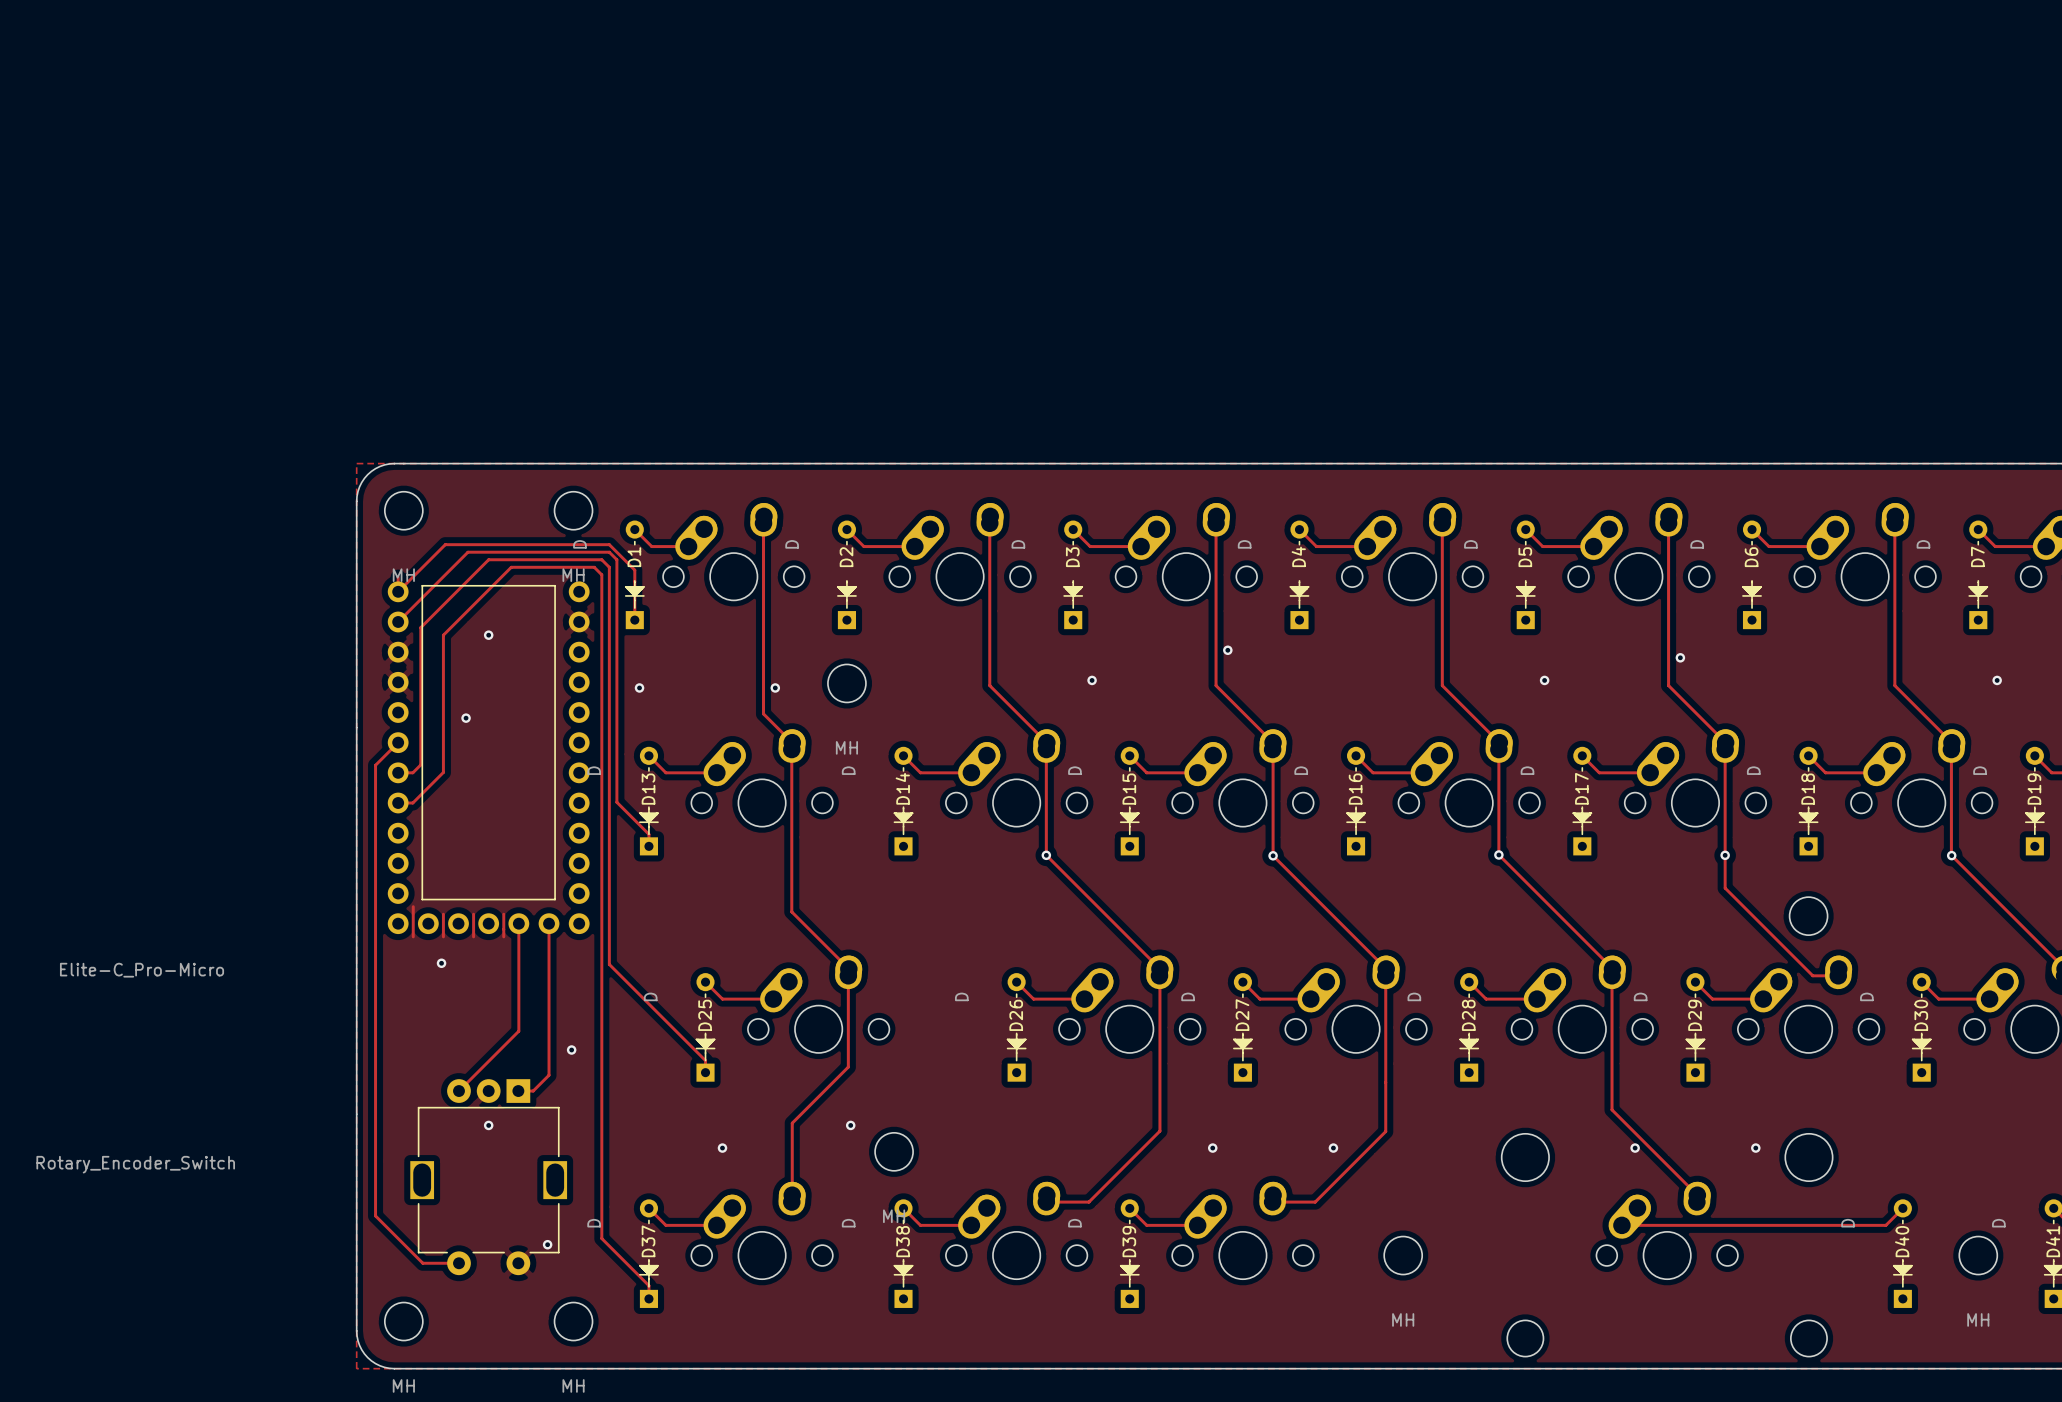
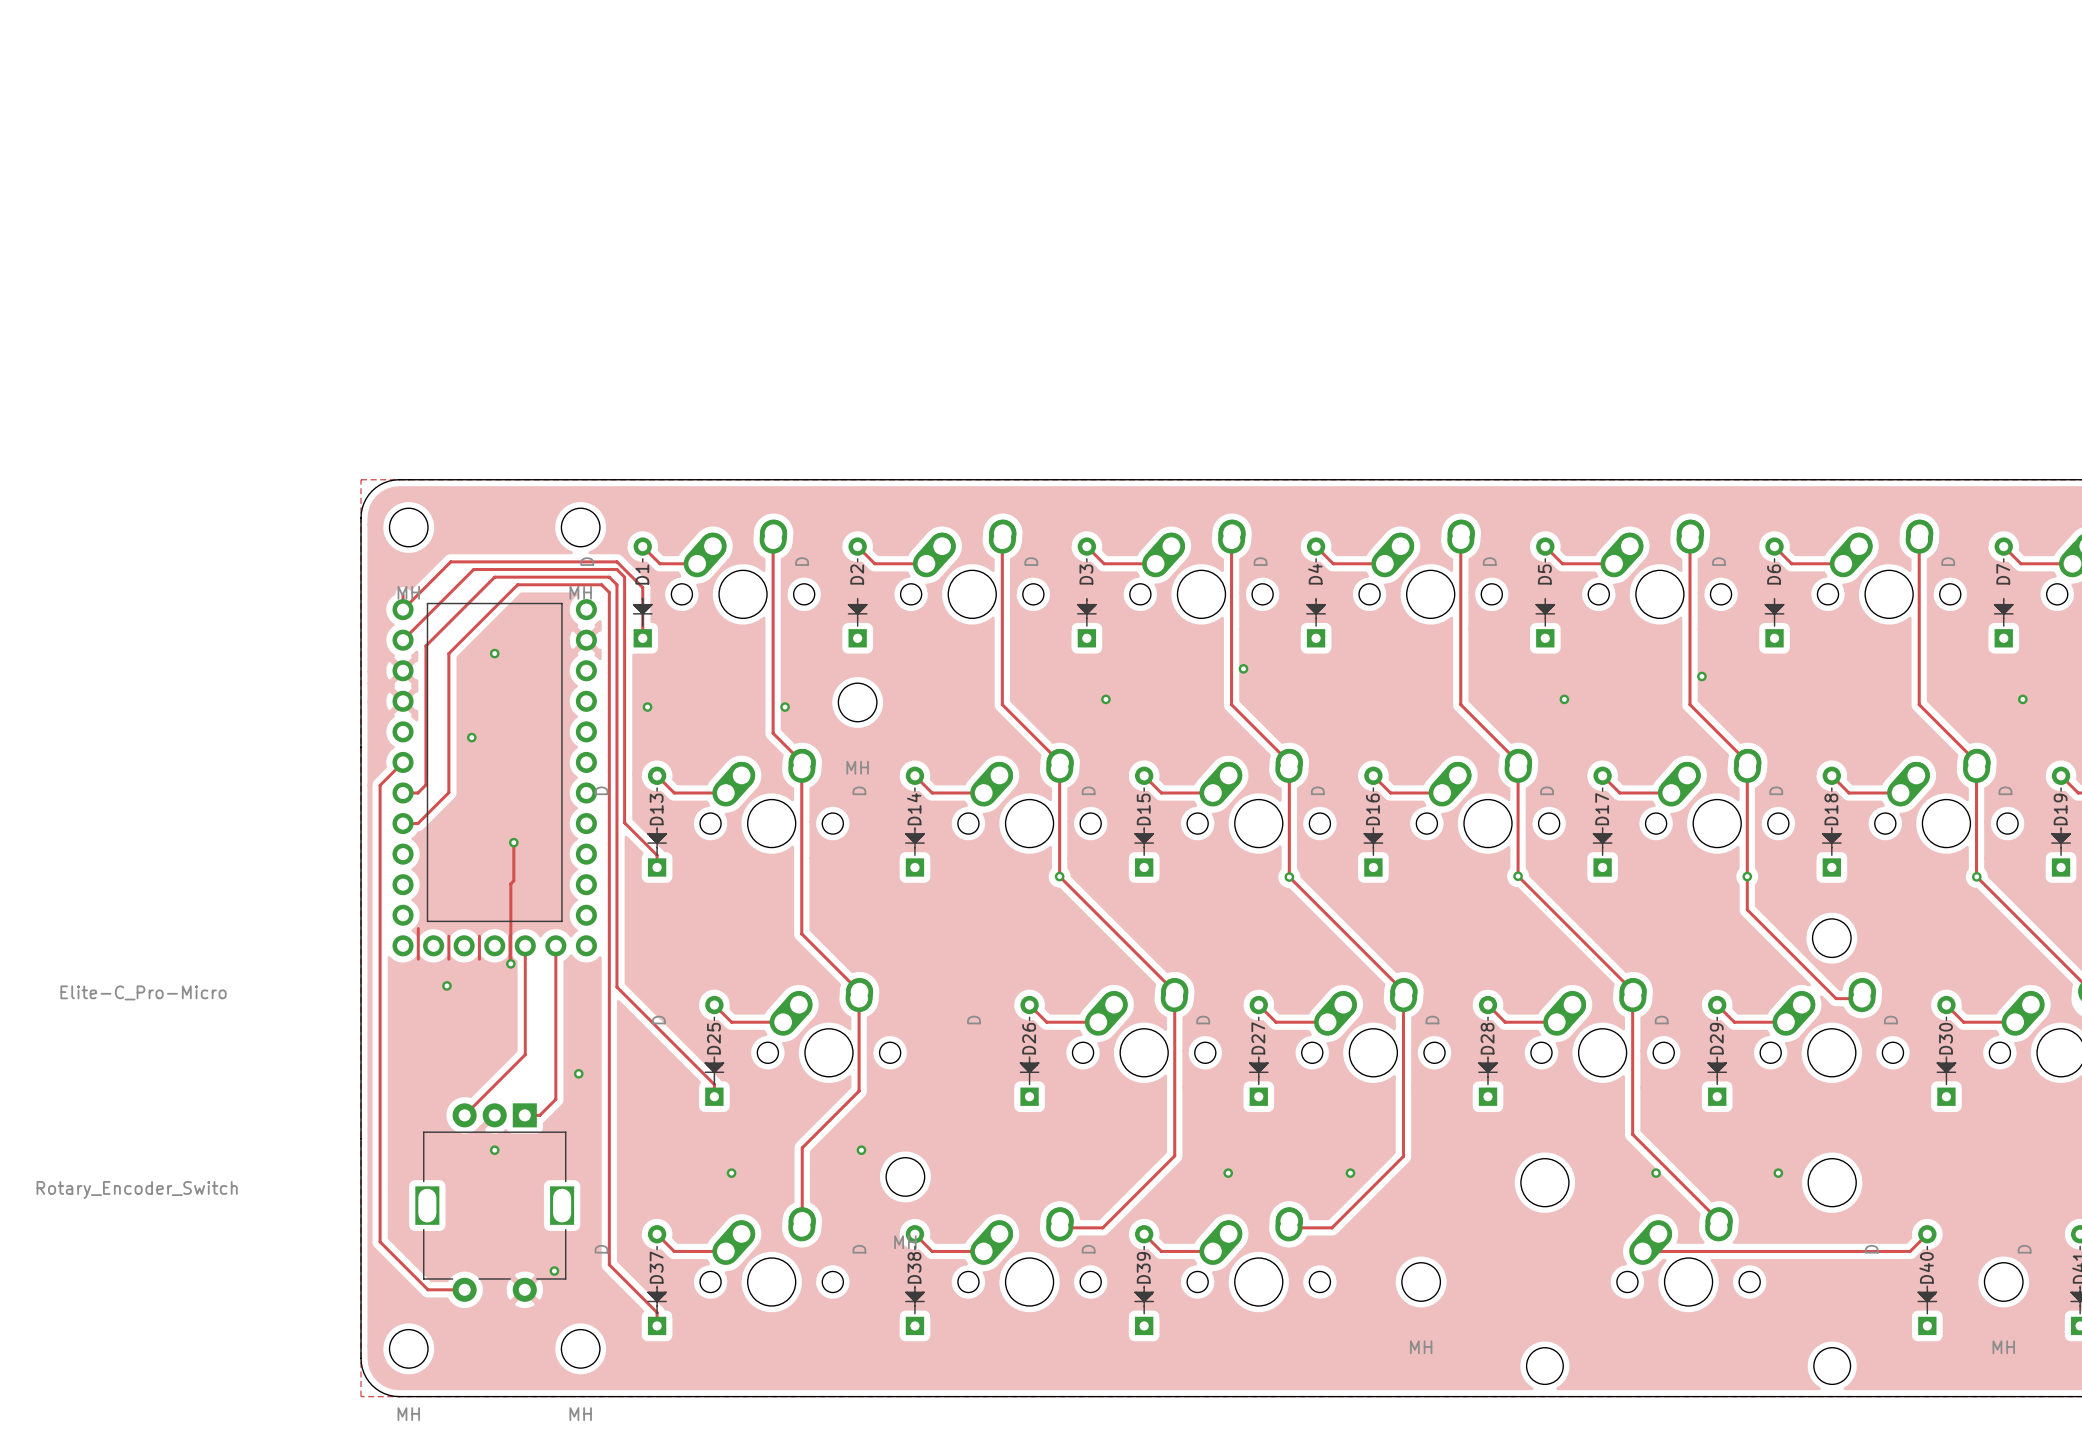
track: none -> (513, 842) (513, 880) (510, 883) (510, 963)
via: none -> (513, 842)
via: none -> (510, 963)

